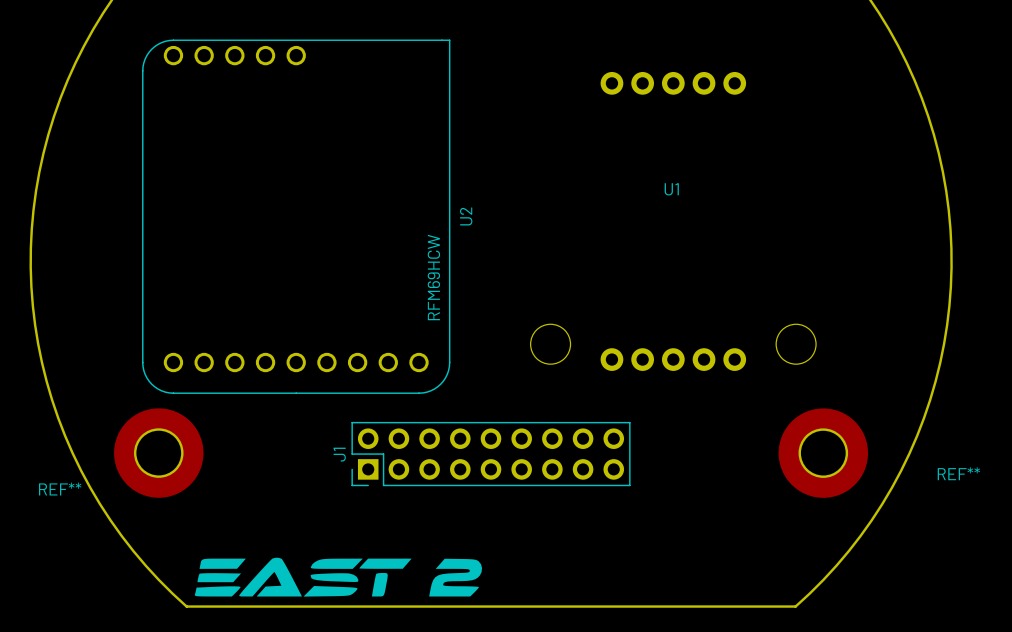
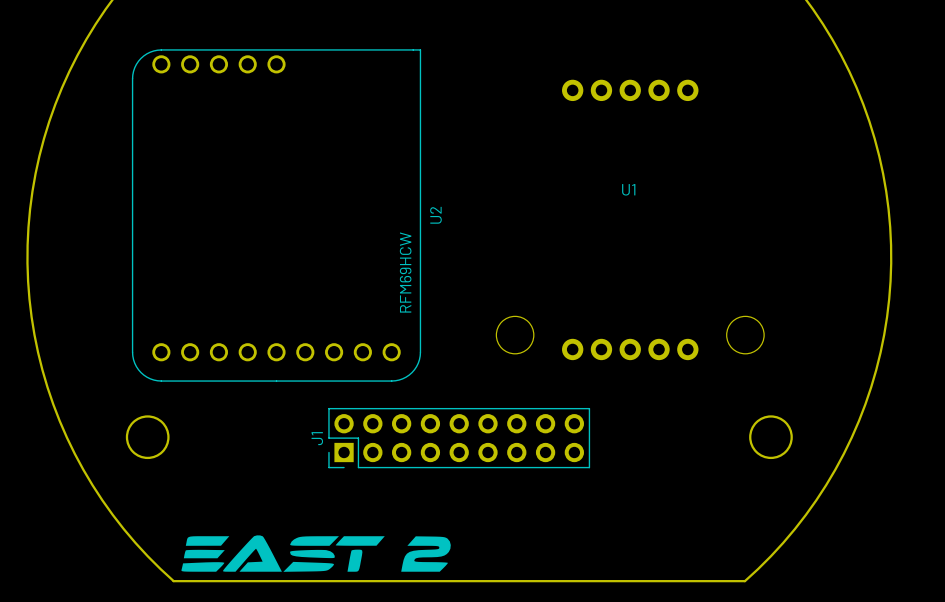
round board edge: none -> [125, 415, 170, 460]
round board edge: none -> [749, 415, 793, 460]
REF**: (158, 453) -> none
REF**: (823, 453) -> none

